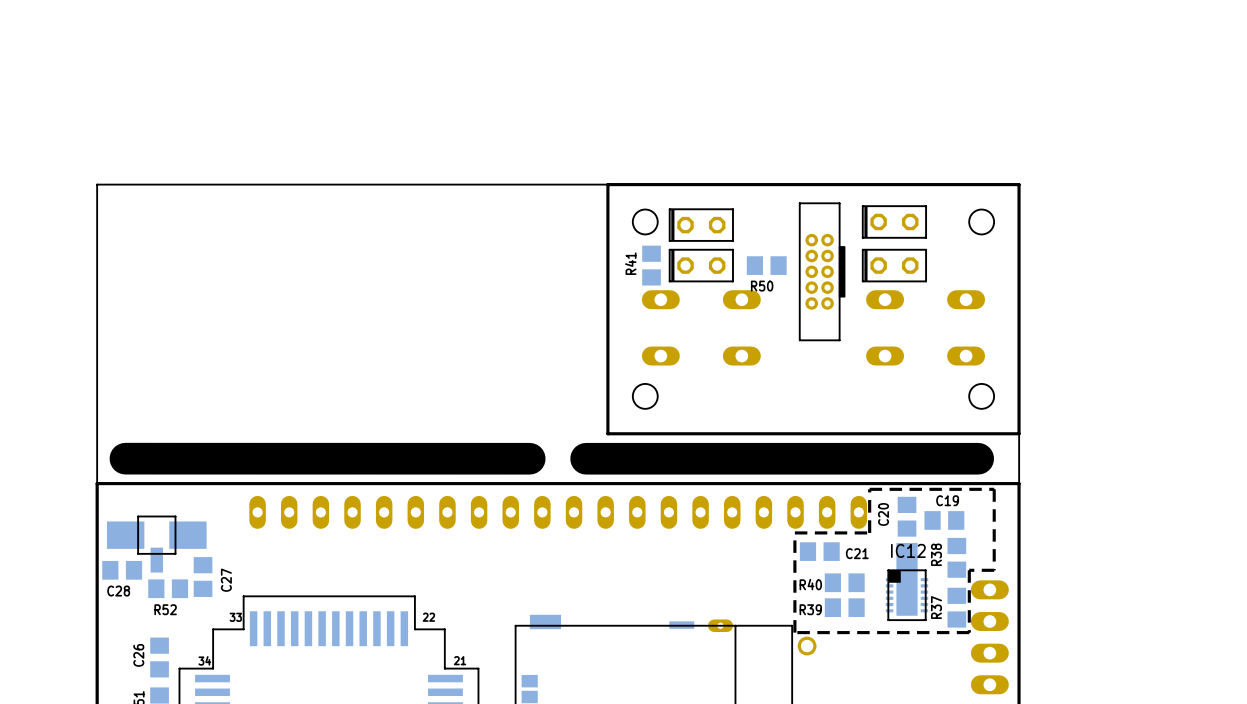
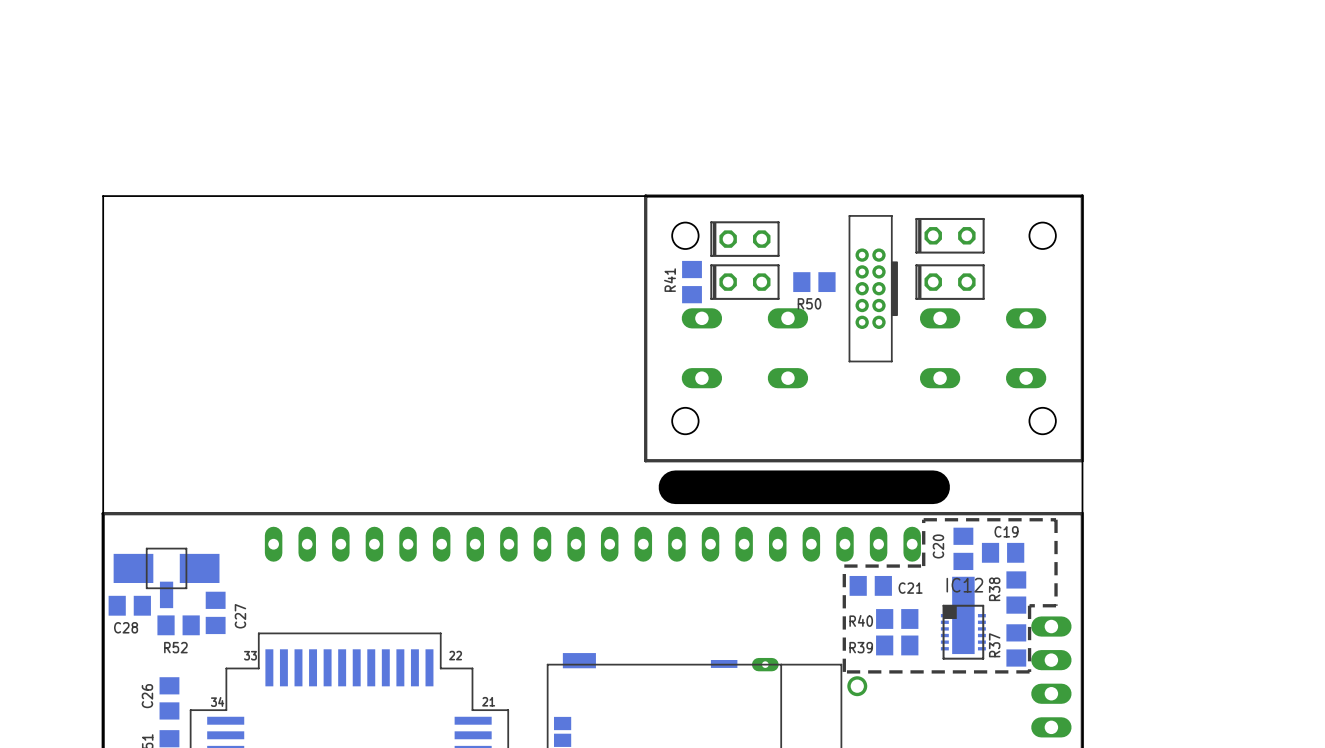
board edge: (529, 458) (125, 458) -> none
board edge: (635, 458) (586, 458) -> none
board edge: (978, 458) (878, 458) -> none

